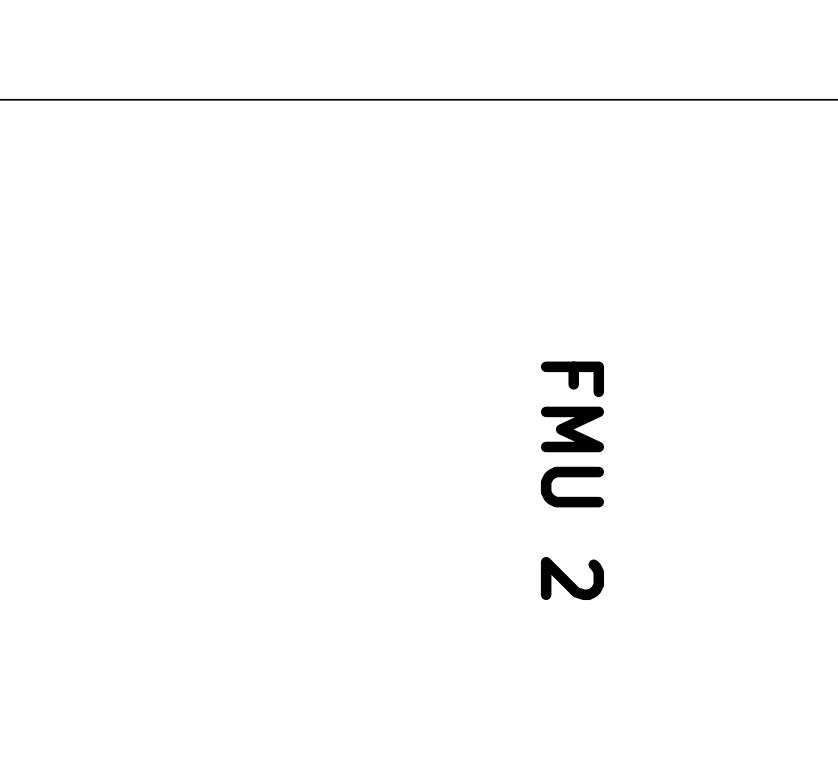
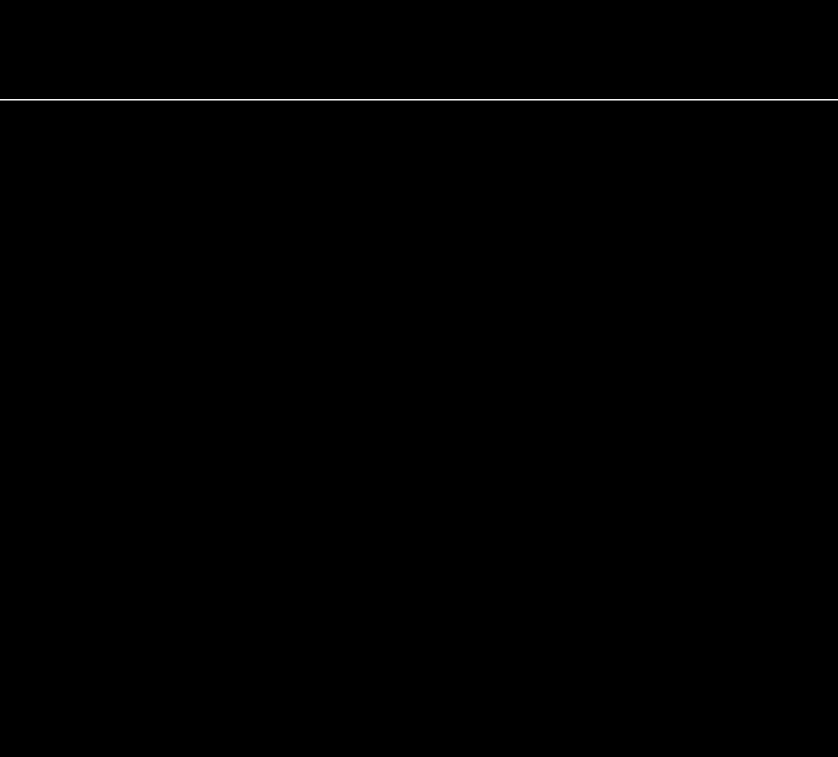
text: FMU 2 (572, 480) -> none

